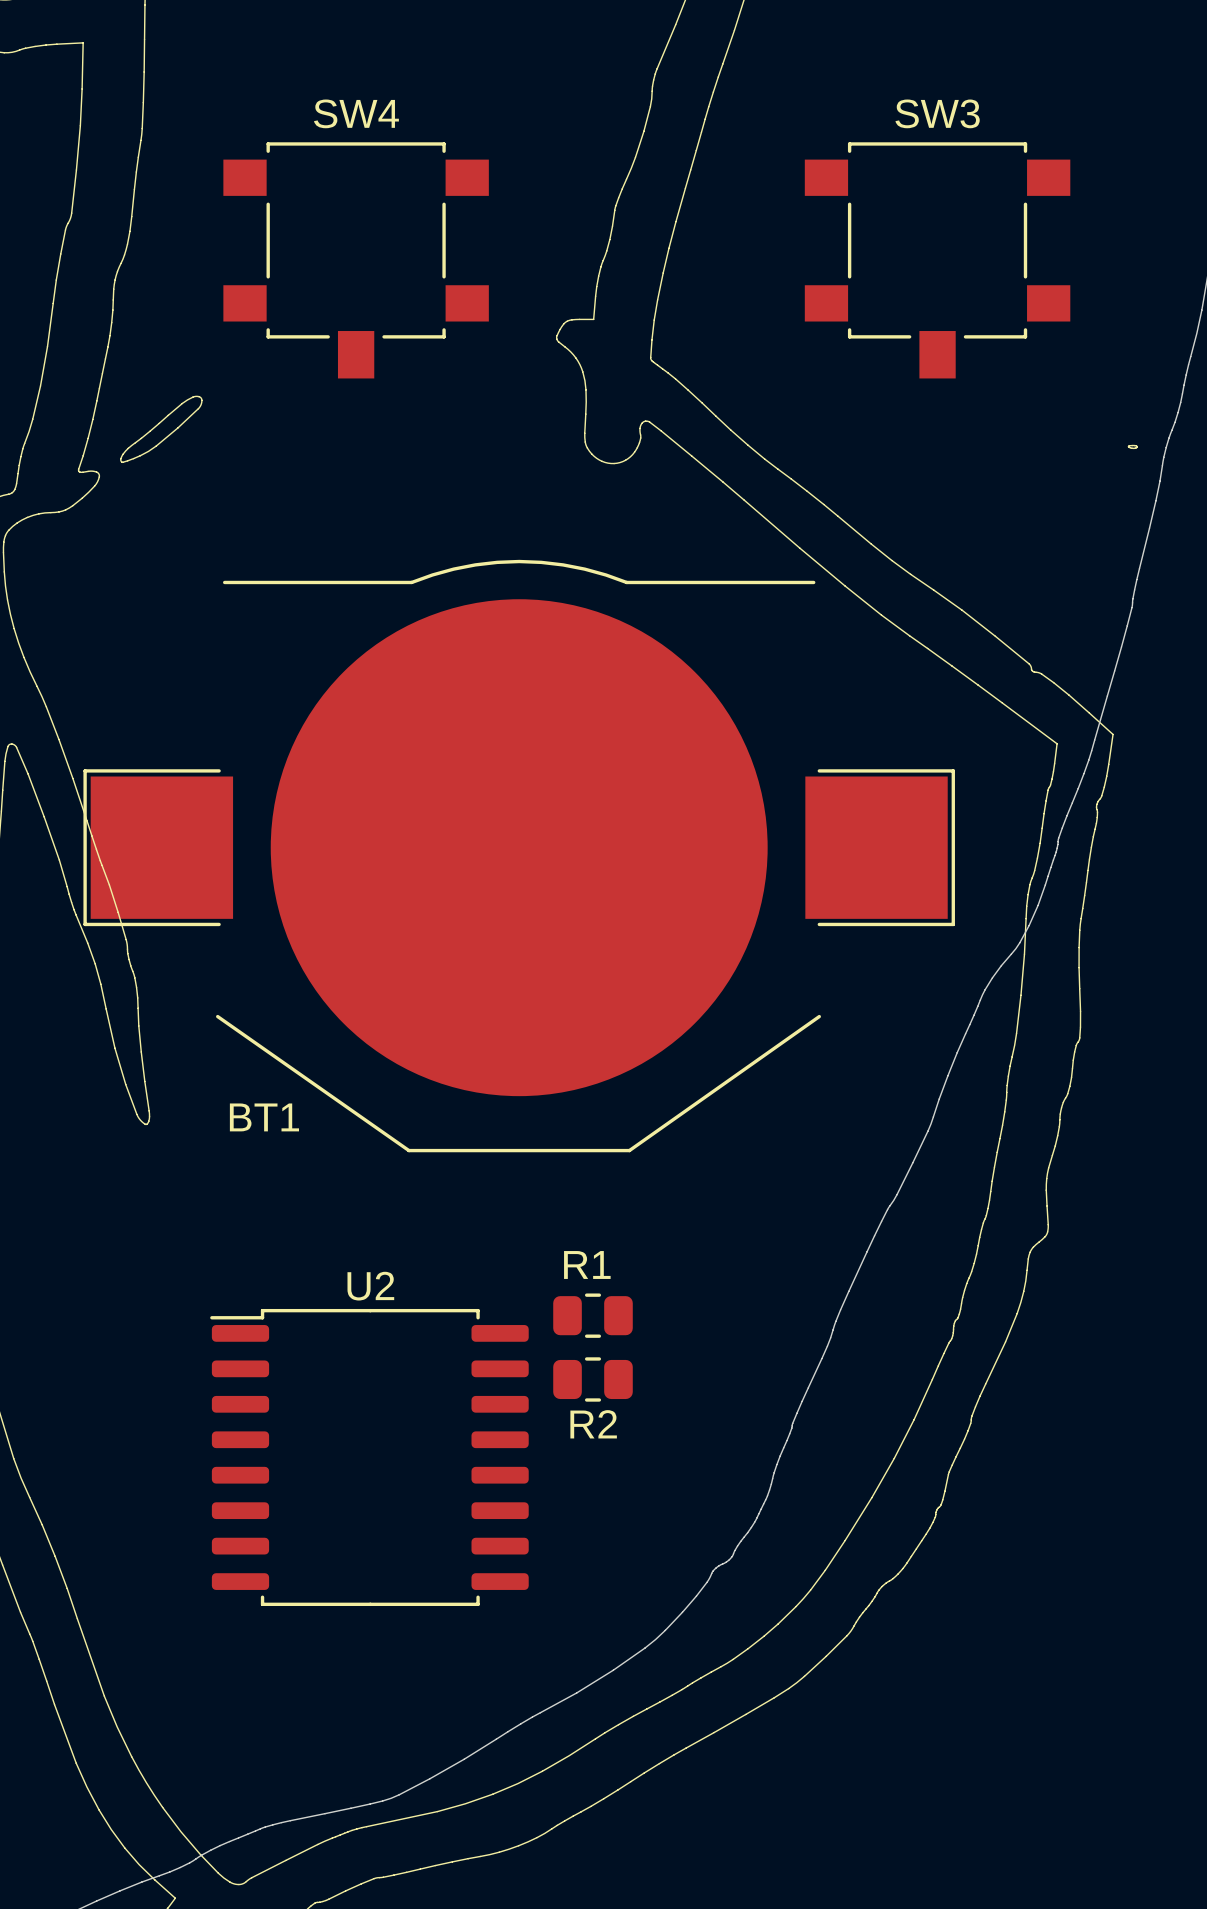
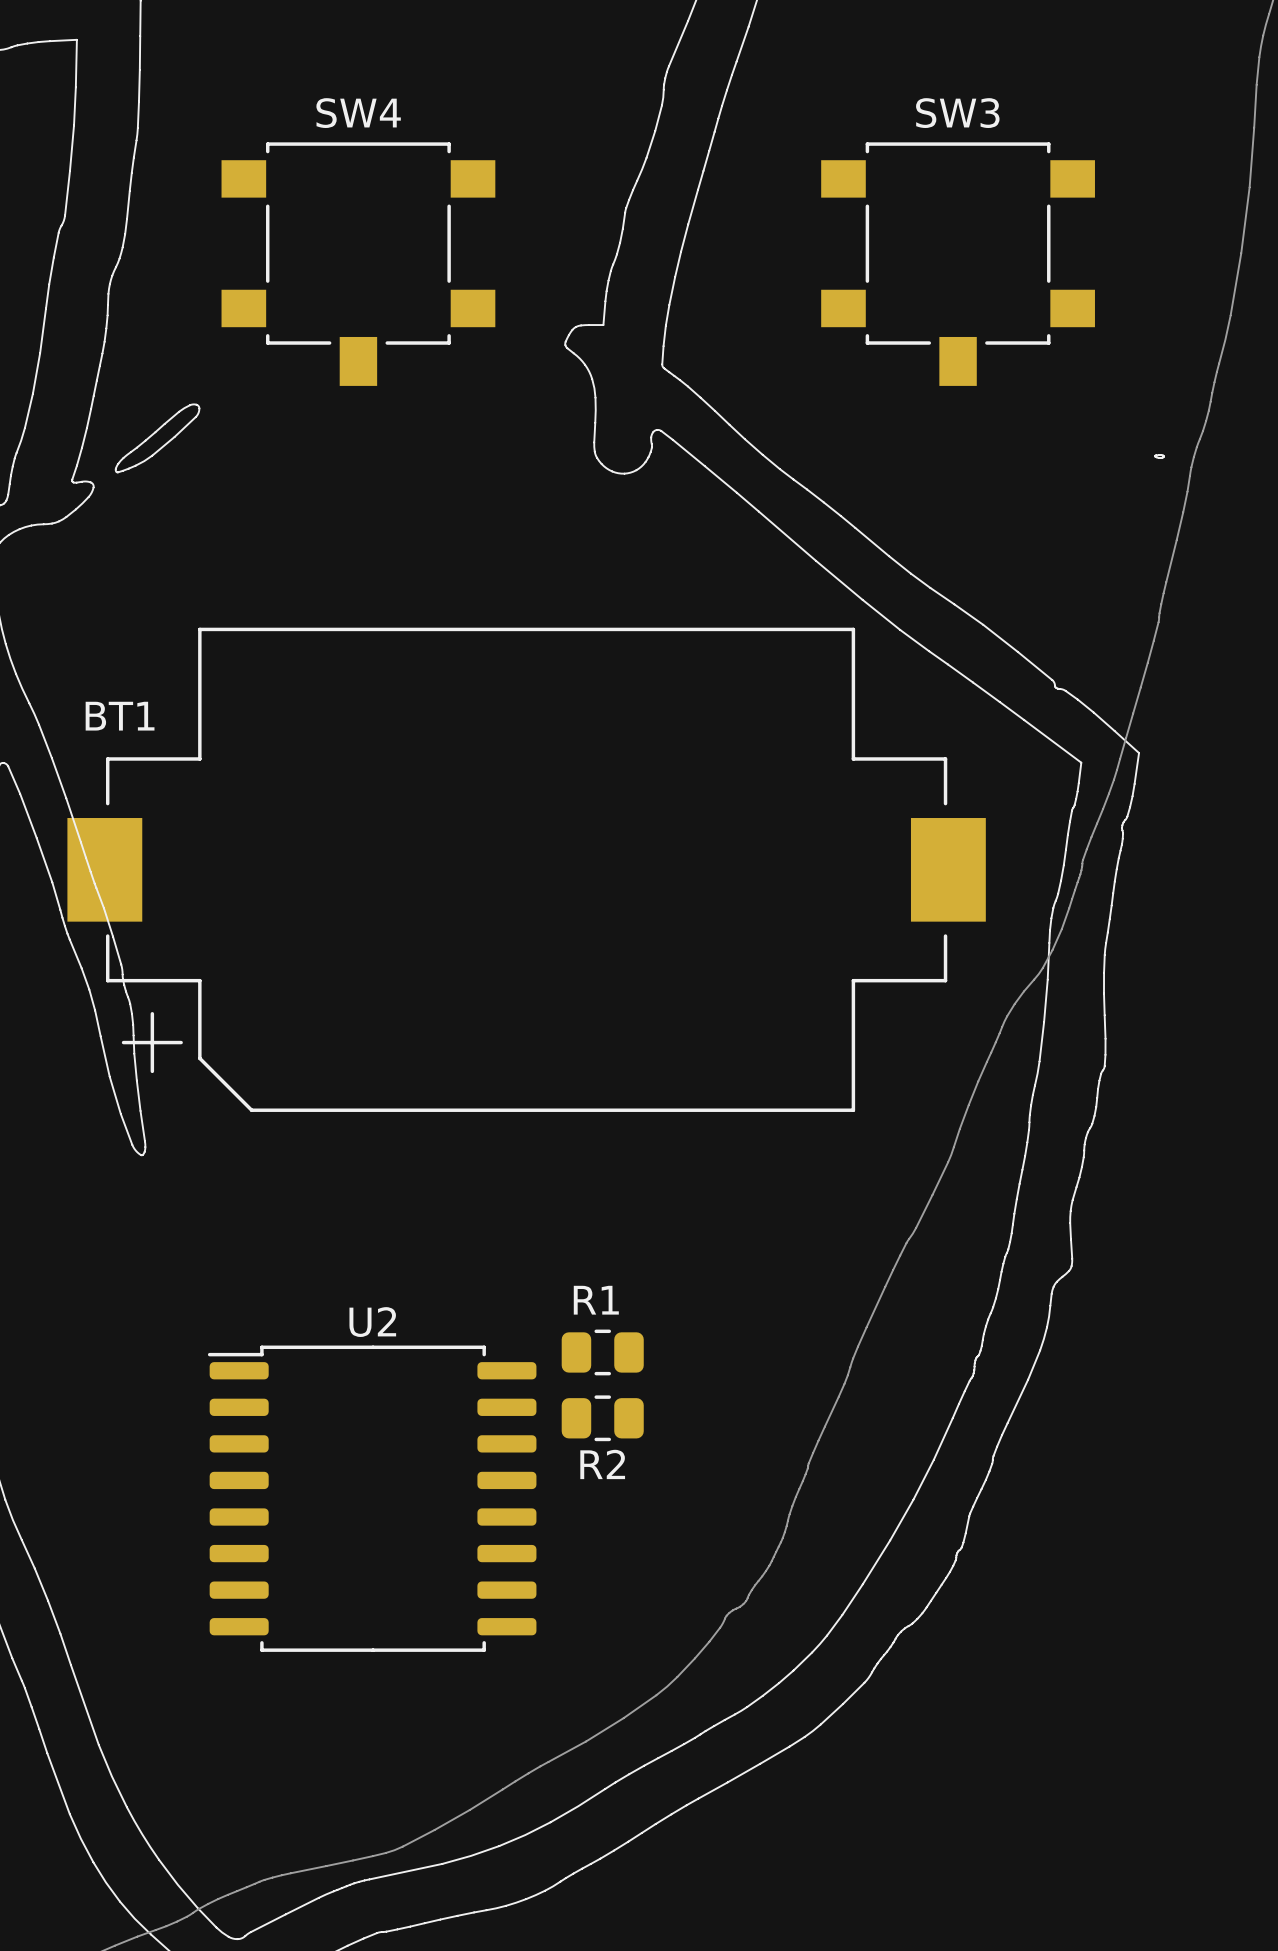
BT1 footprint: [83, 559, 955, 1153] -> [67, 627, 986, 1112]
BT1 name position: BT1 (264, 1117) -> BT1 (120, 716)

